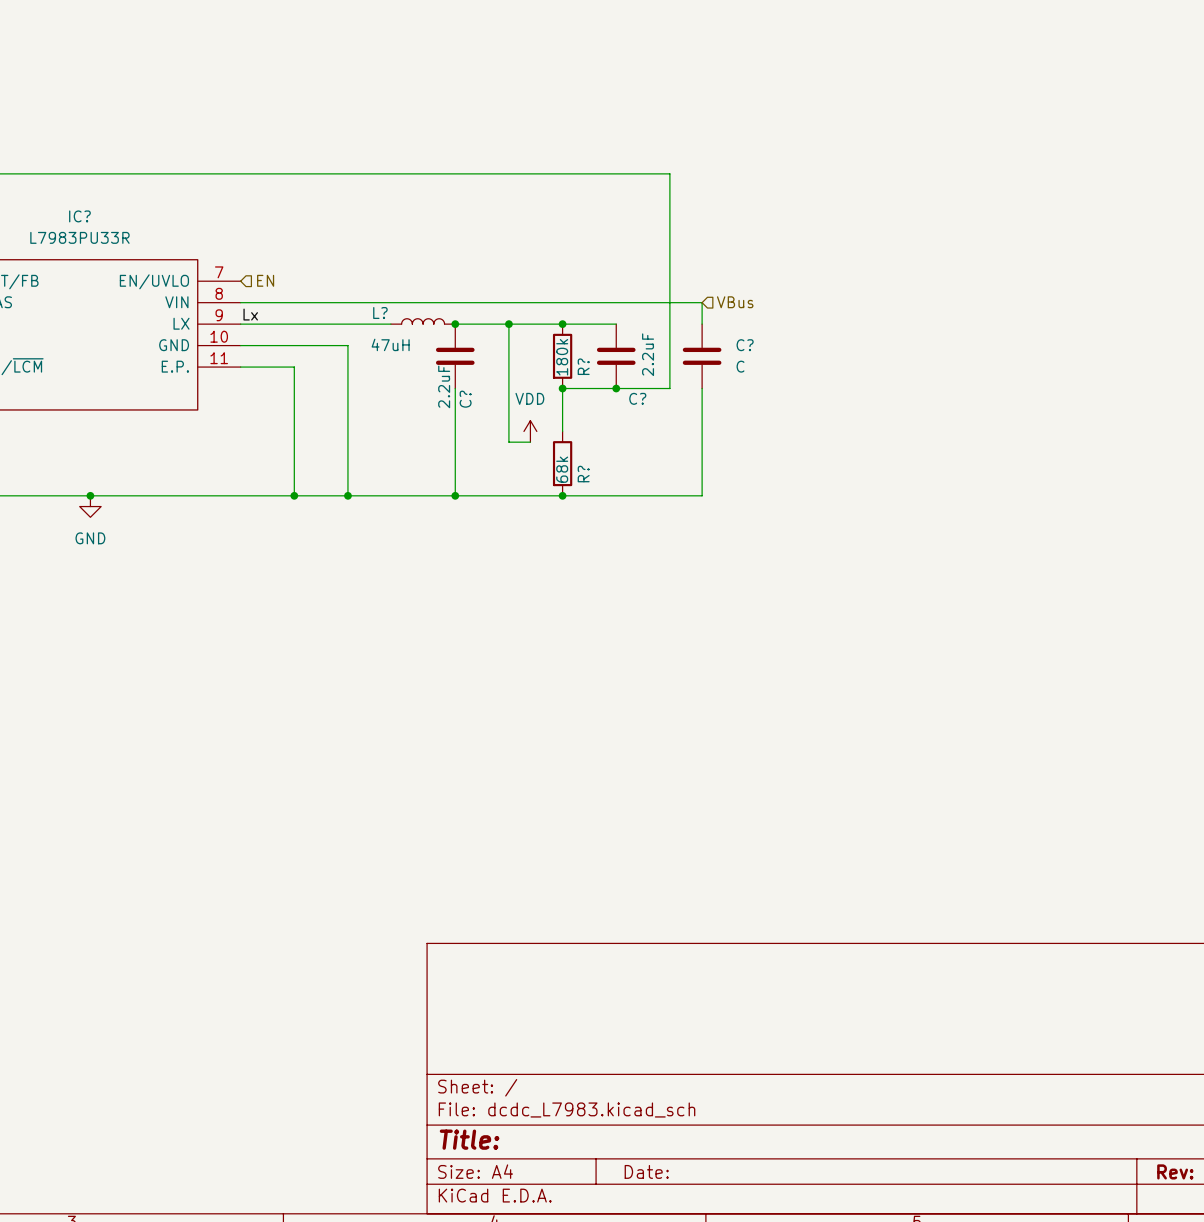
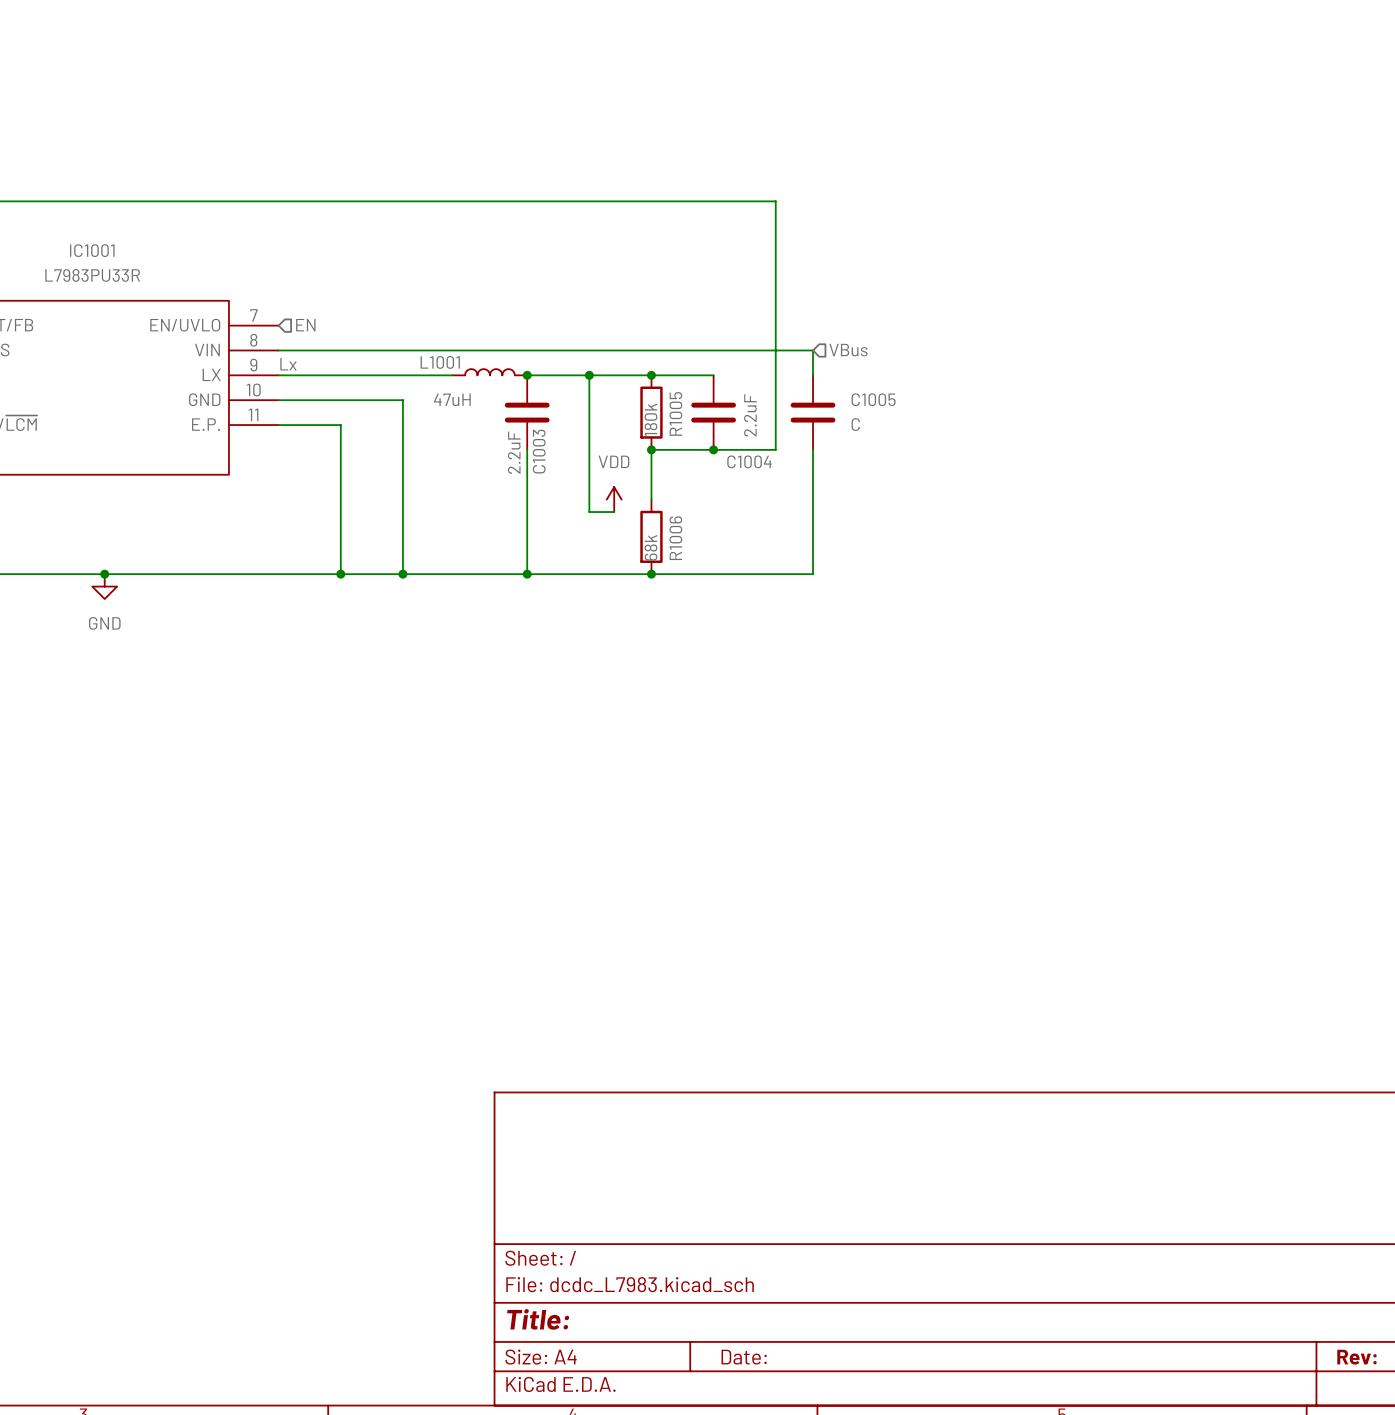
IC? name: IC? (79, 216) -> IC1001 (92, 250)
L? name: L? (380, 312) -> L1001 (440, 362)
C? name: C? (745, 345) -> C1005 (873, 399)
R? name: R? (583, 366) -> R1005 (675, 413)
C? name: C? (637, 398) -> C1004 (749, 461)
C? name: C? (465, 399) -> C1003 (539, 451)
R? name: R? (583, 474) -> R1006 (675, 538)

